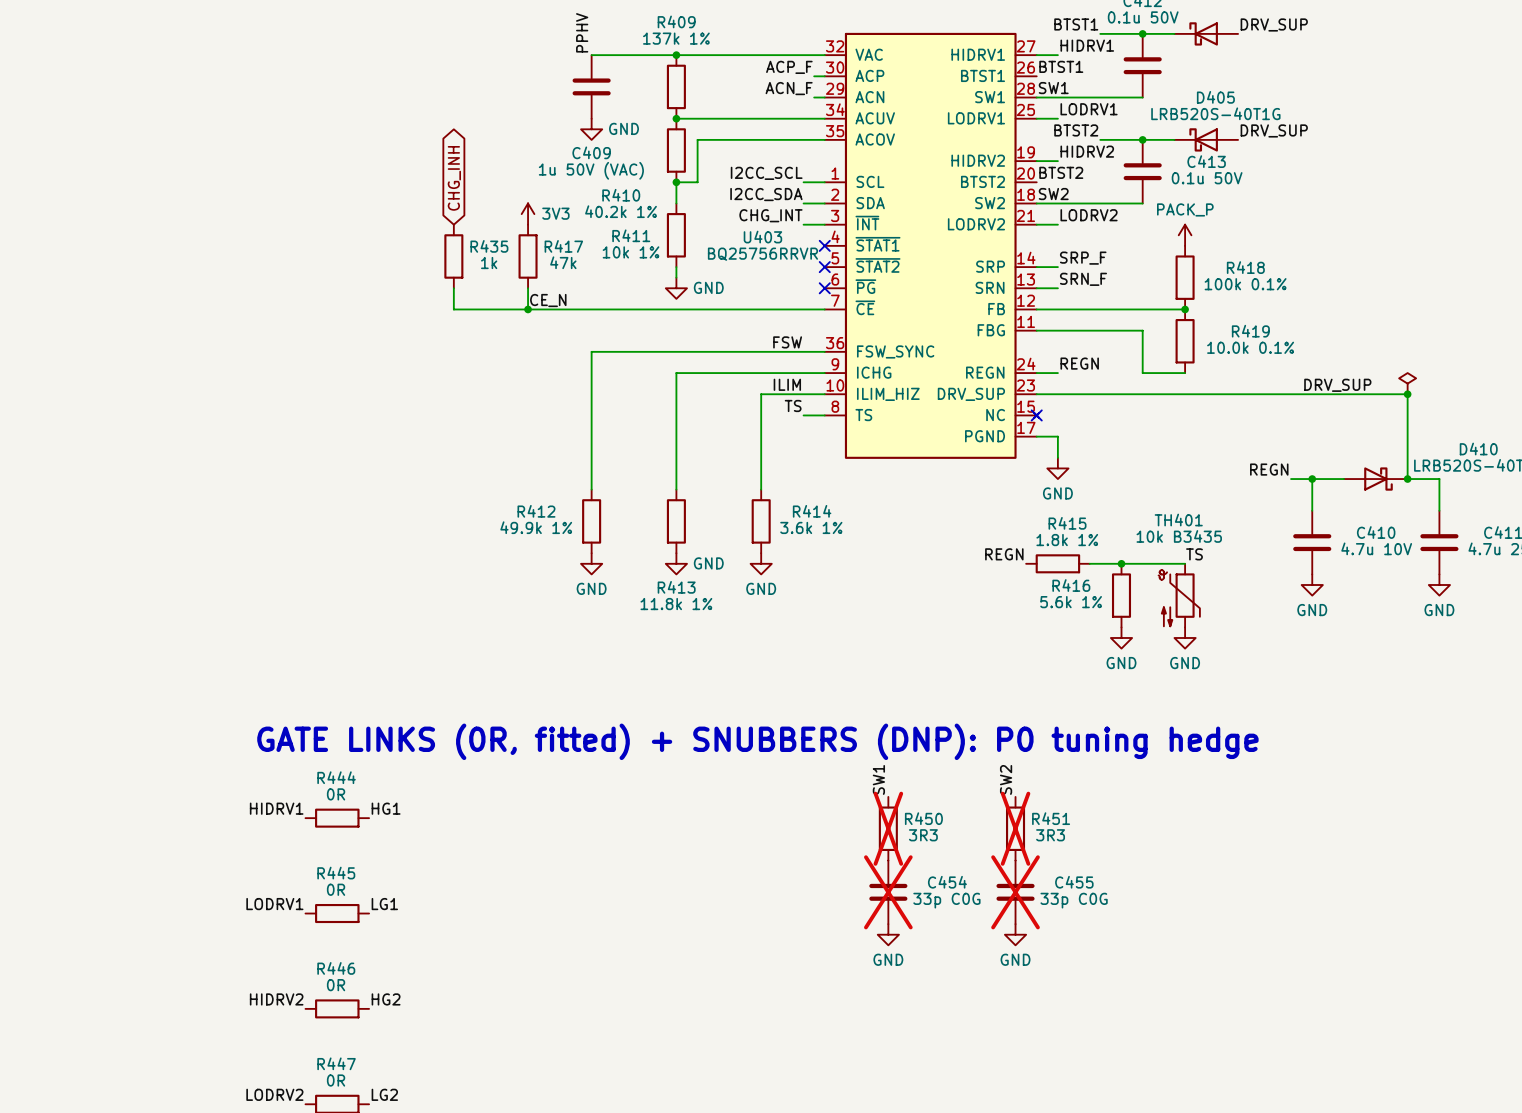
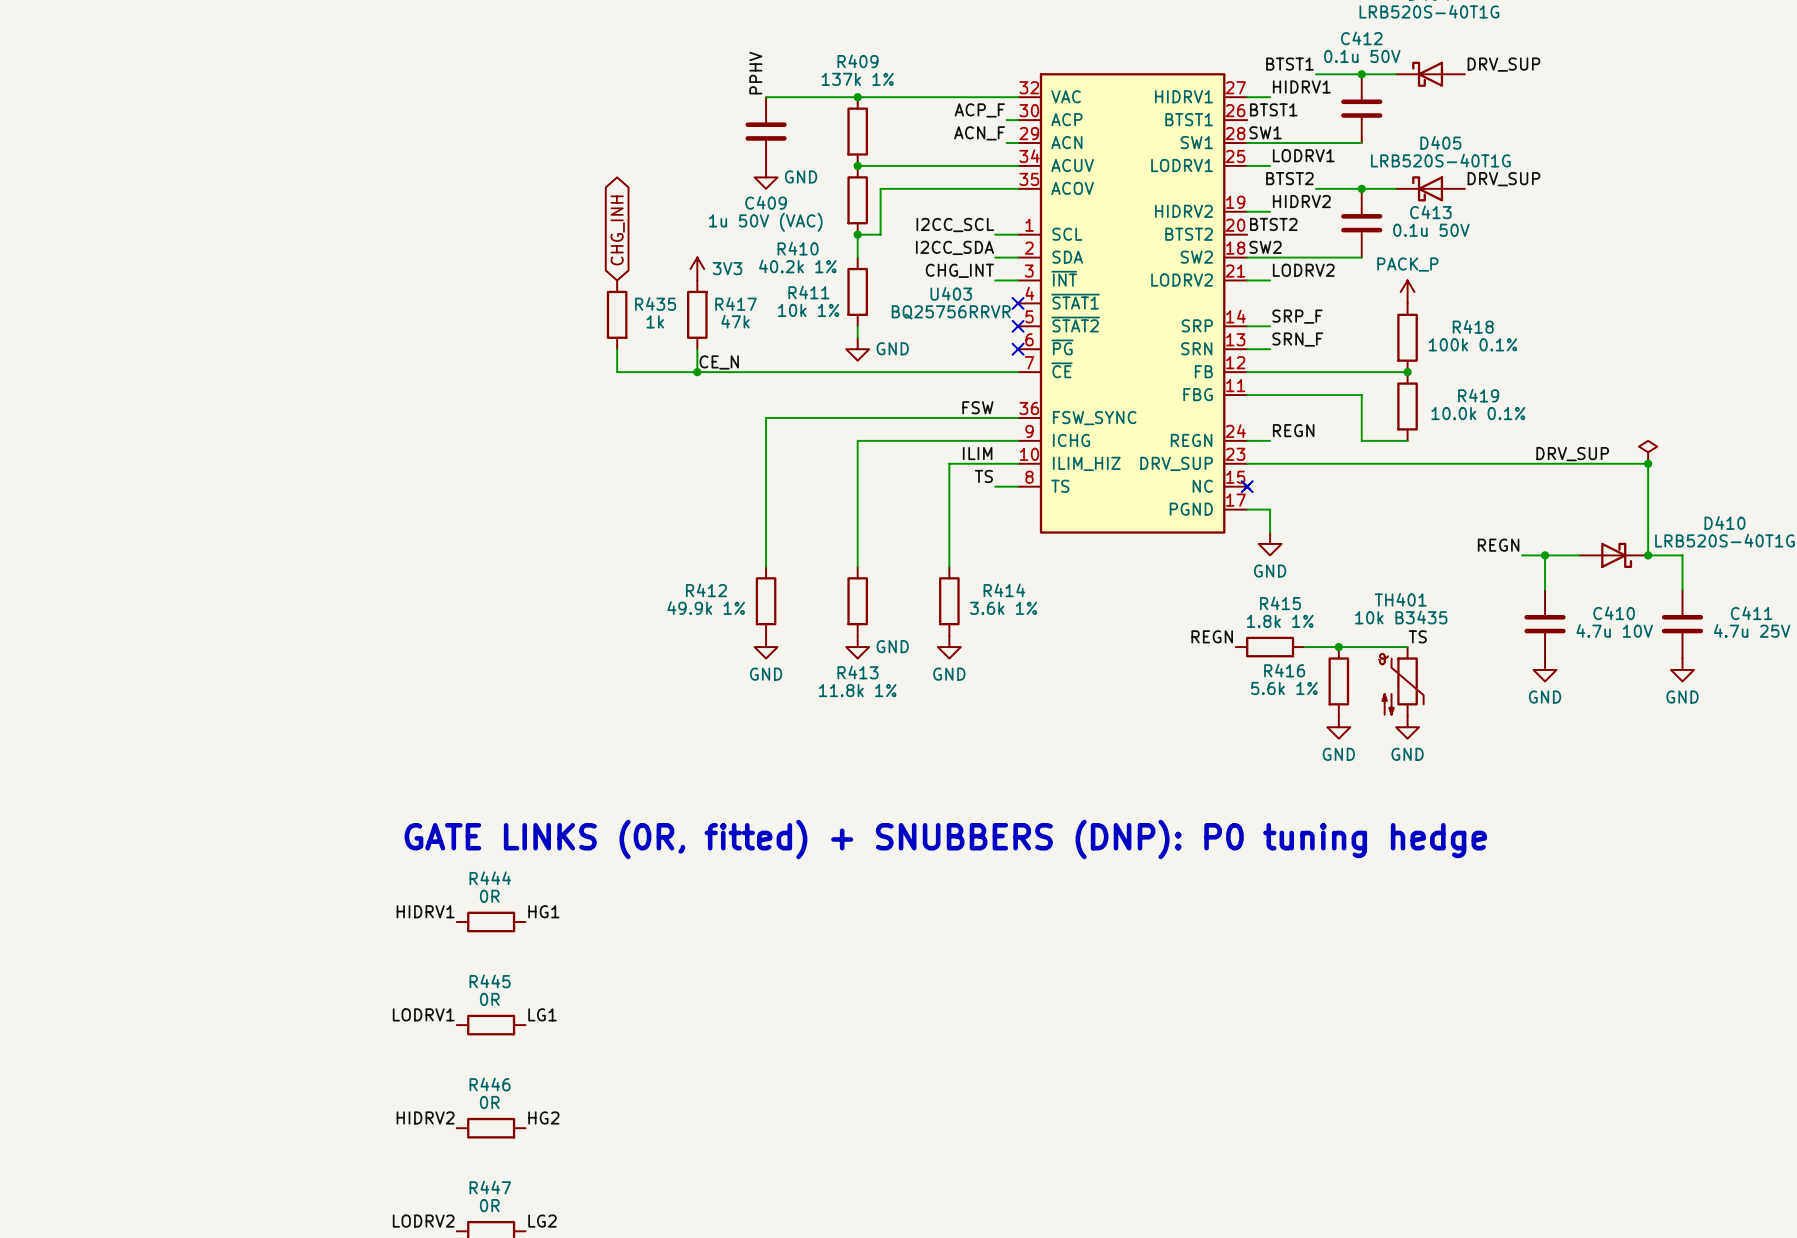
label: SW1 (878, 779) -> none
label: SW2 (1006, 779) -> none
R450: 3R3 (888, 828) -> none
R451: 3R3 (1015, 828) -> none
C454: 33p C0G (888, 892) -> none
C455: 33p C0G (1015, 892) -> none
power symbol: GND (888, 934) -> none
power symbol: GND (1015, 934) -> none

